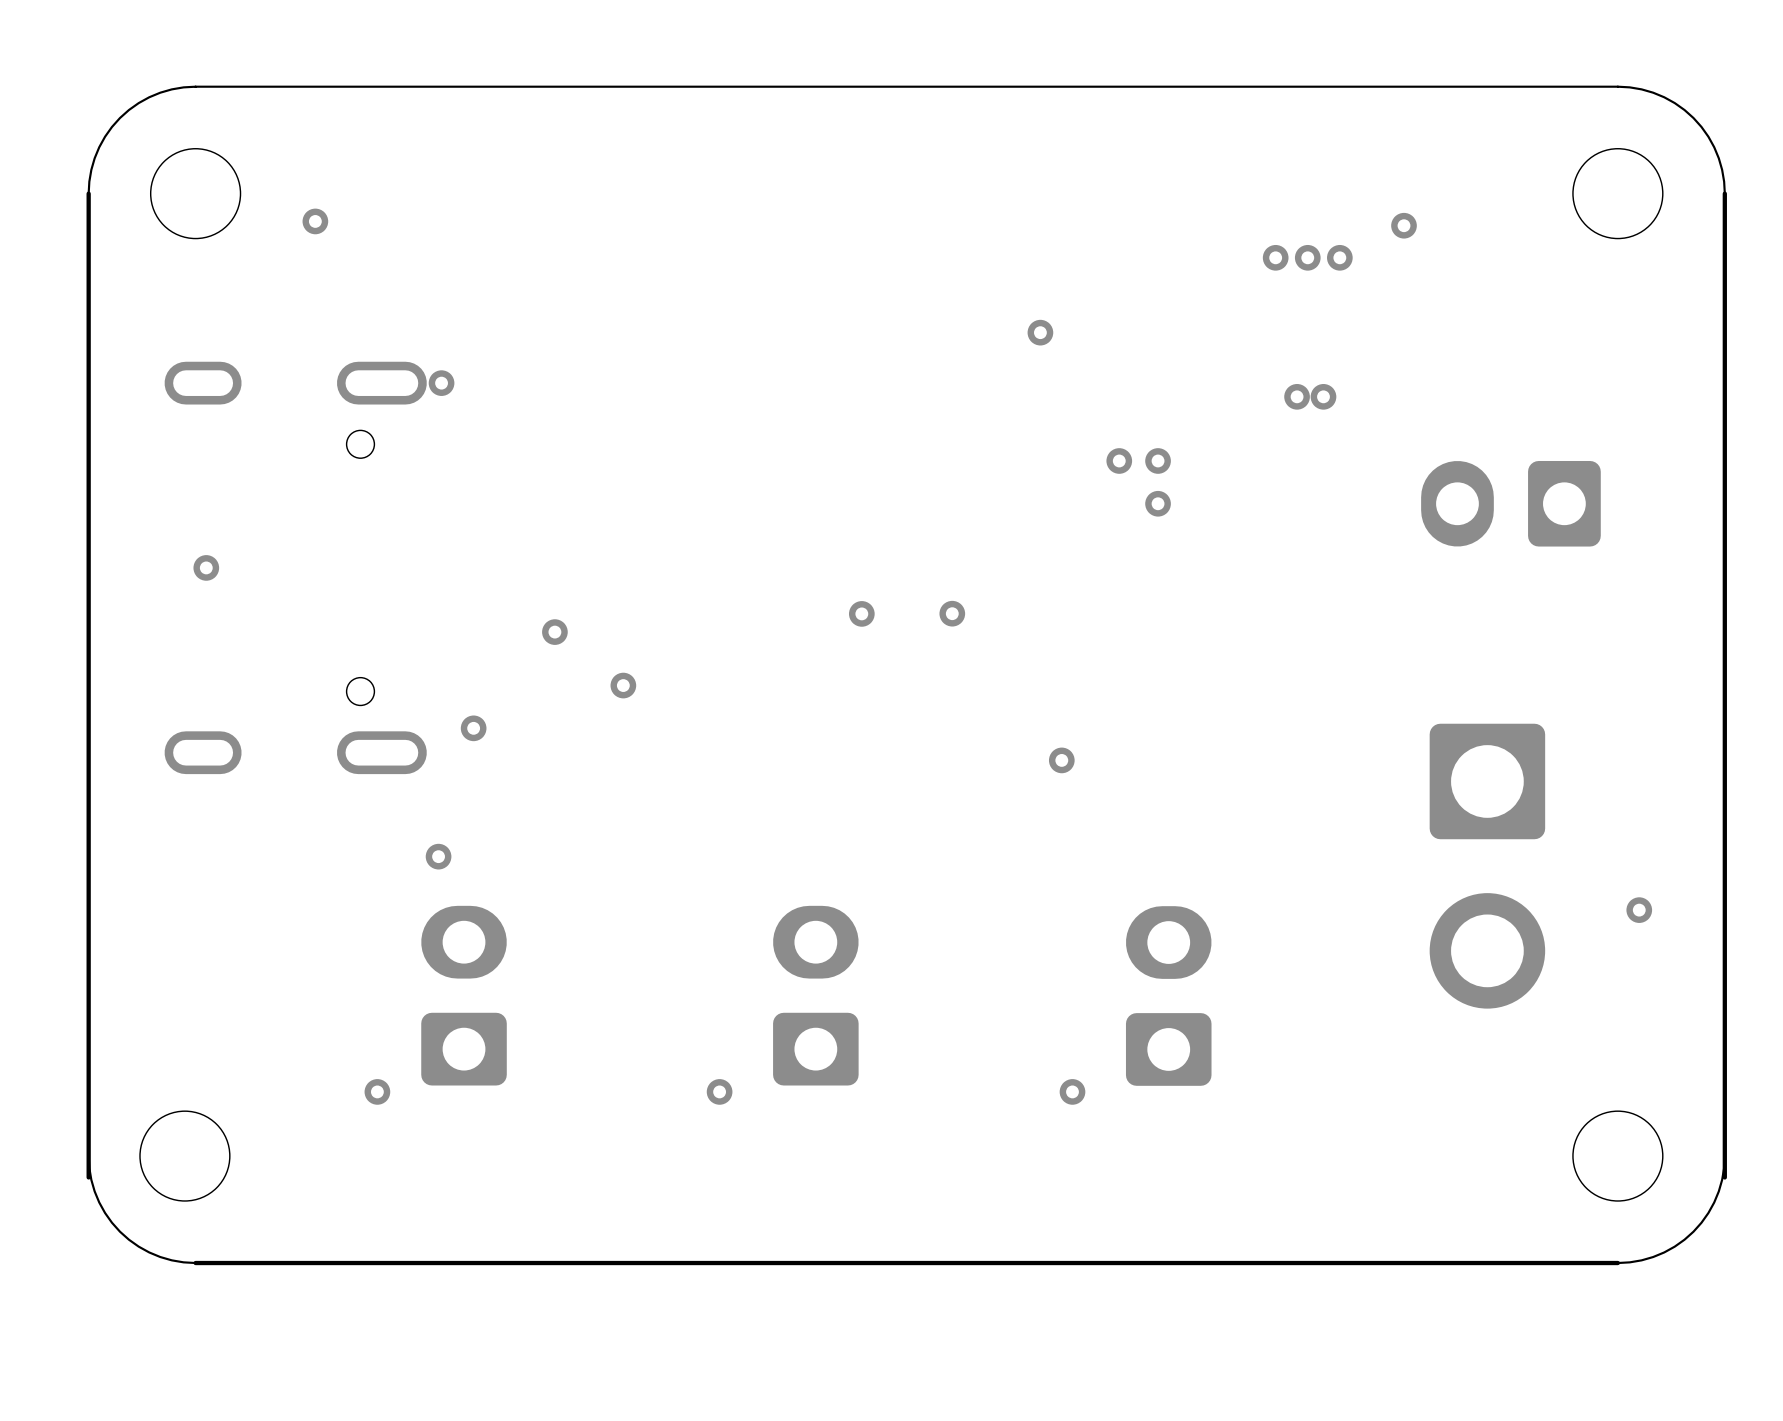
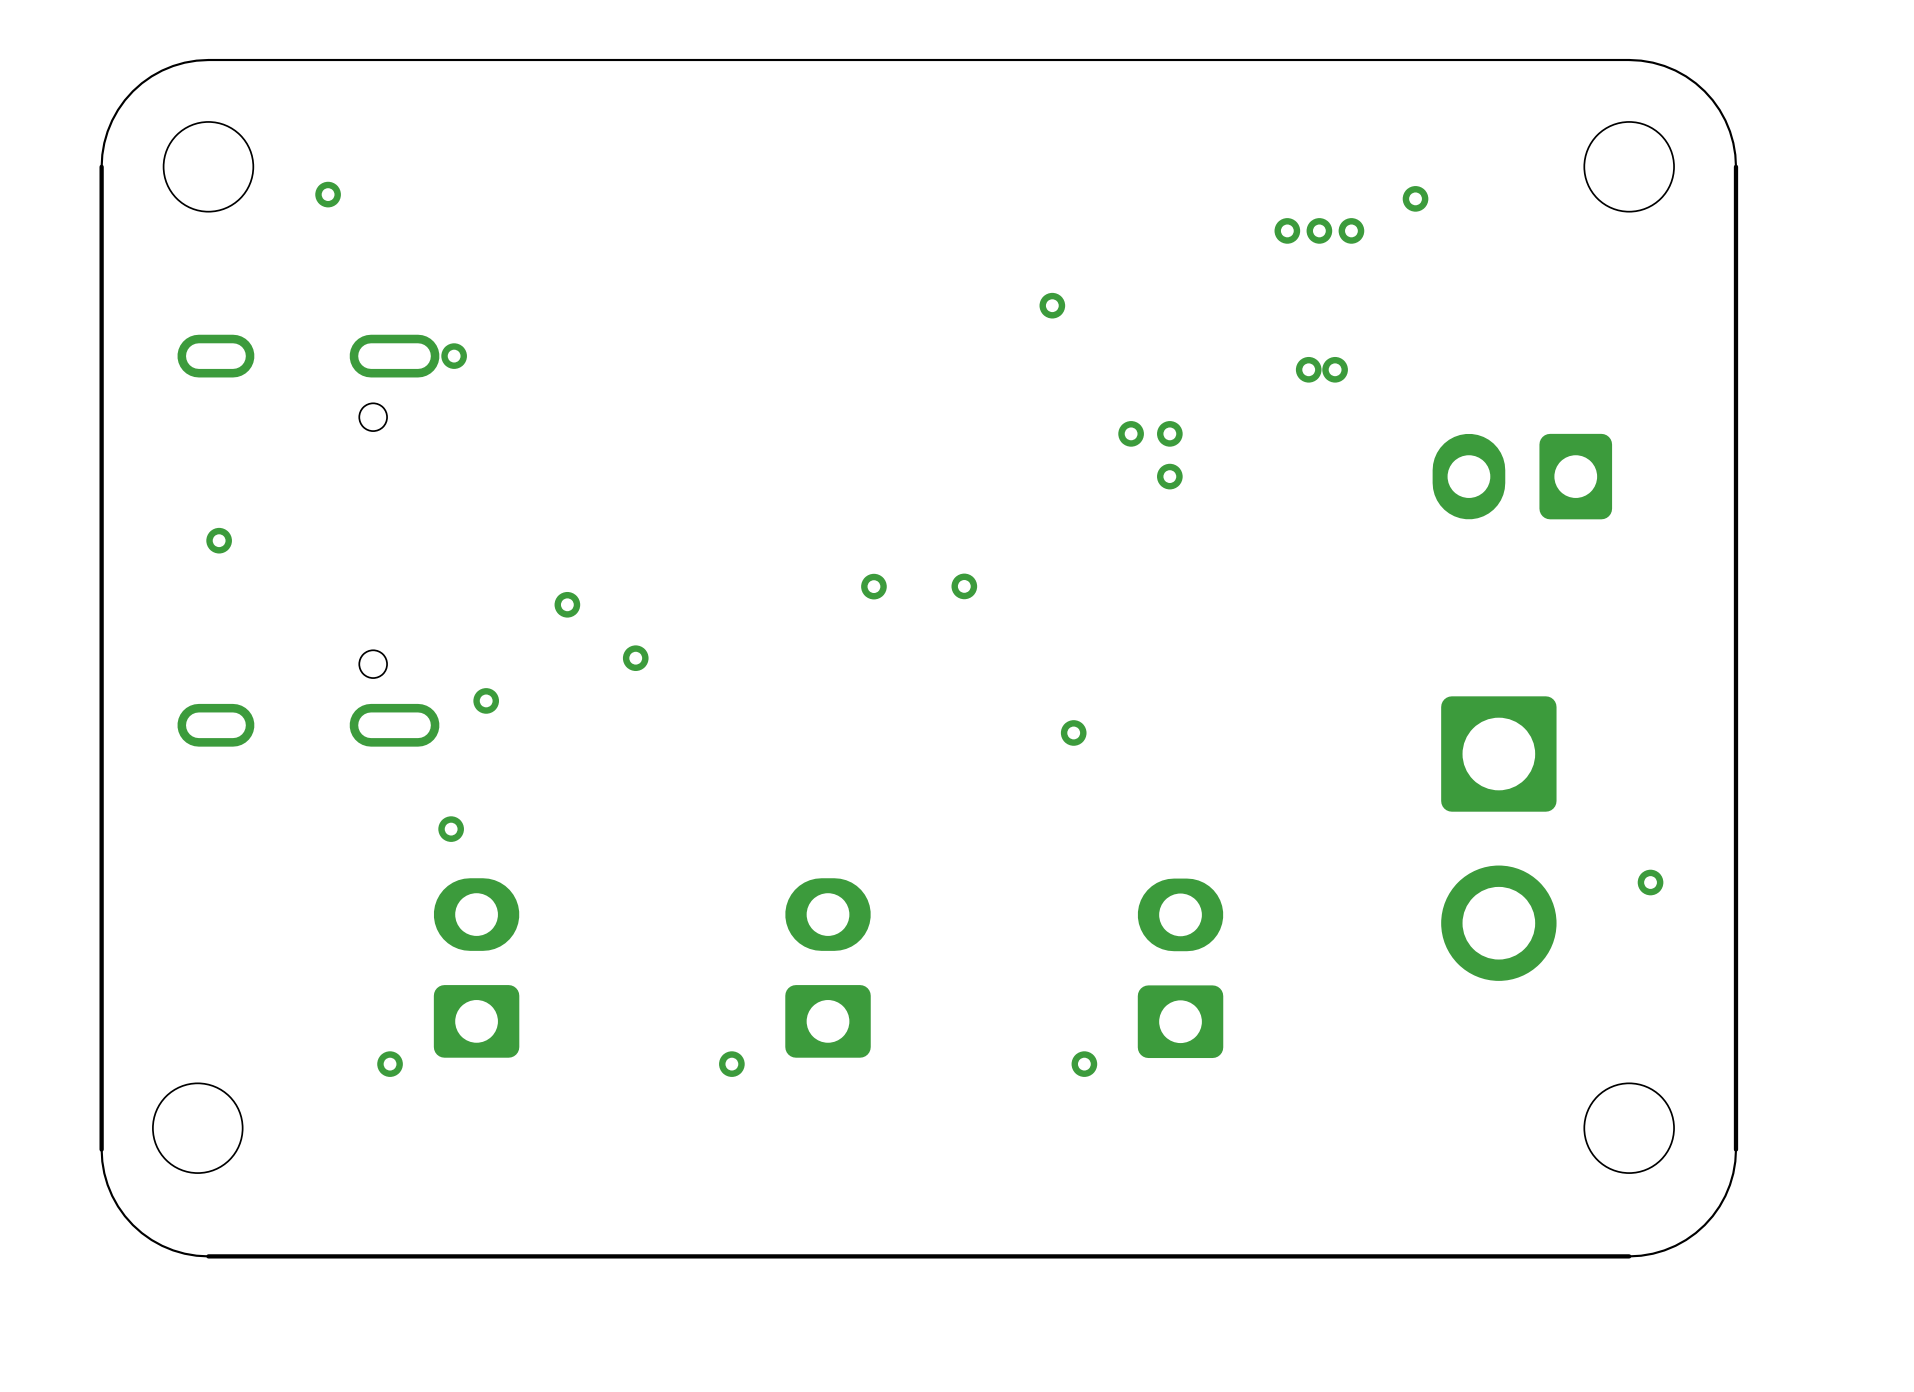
board edge: (1724, 1156) (1718, 1191) (1708, 1212) (1693, 1231) (1674, 1246) (1653, 1257) (1617, 1263) (183, 1262) (160, 1257) (138, 1246) (111, 1222) (94, 1191) (88, 1156) -> (1735, 1149) (1730, 1184) (1719, 1206) (1704, 1225) (1686, 1240) (1664, 1250) (1629, 1256) (196, 1255) (173, 1250) (151, 1240) (124, 1216) (107, 1184) (101, 1149)

